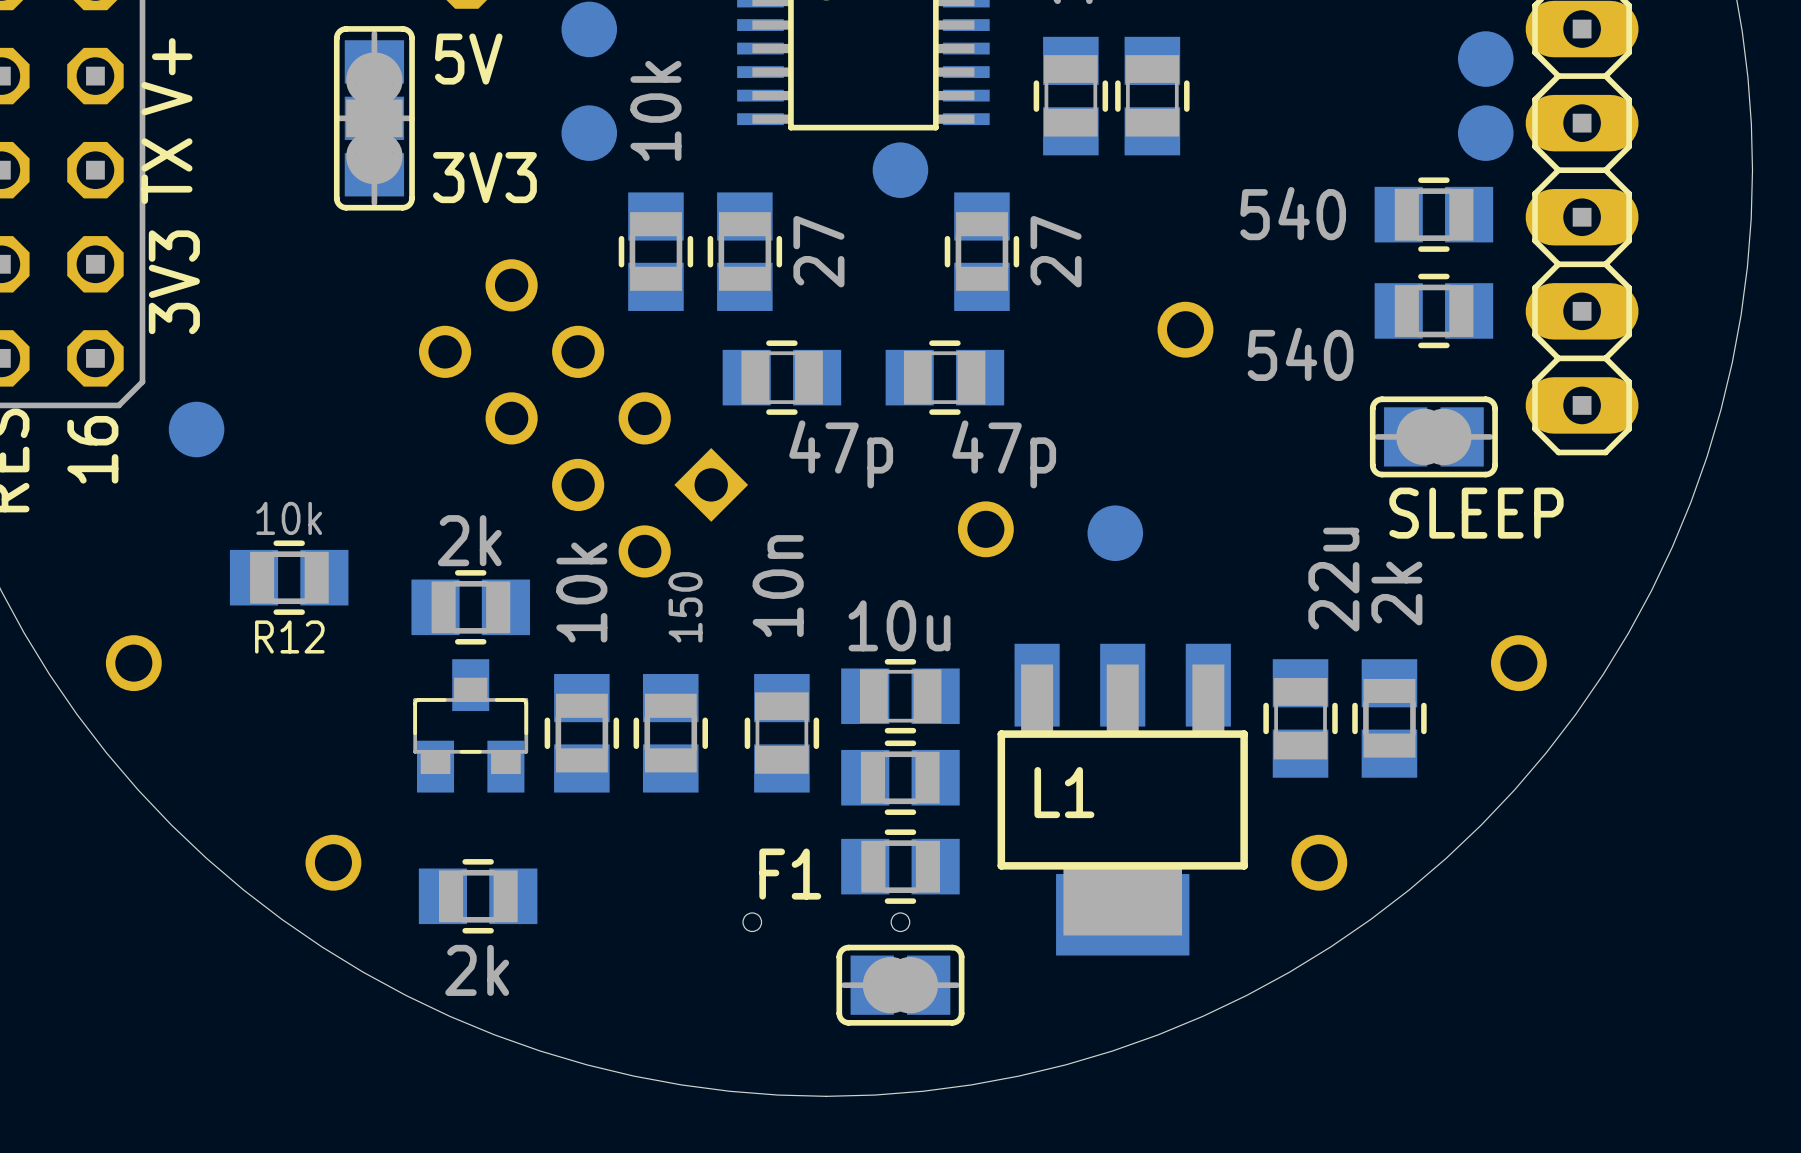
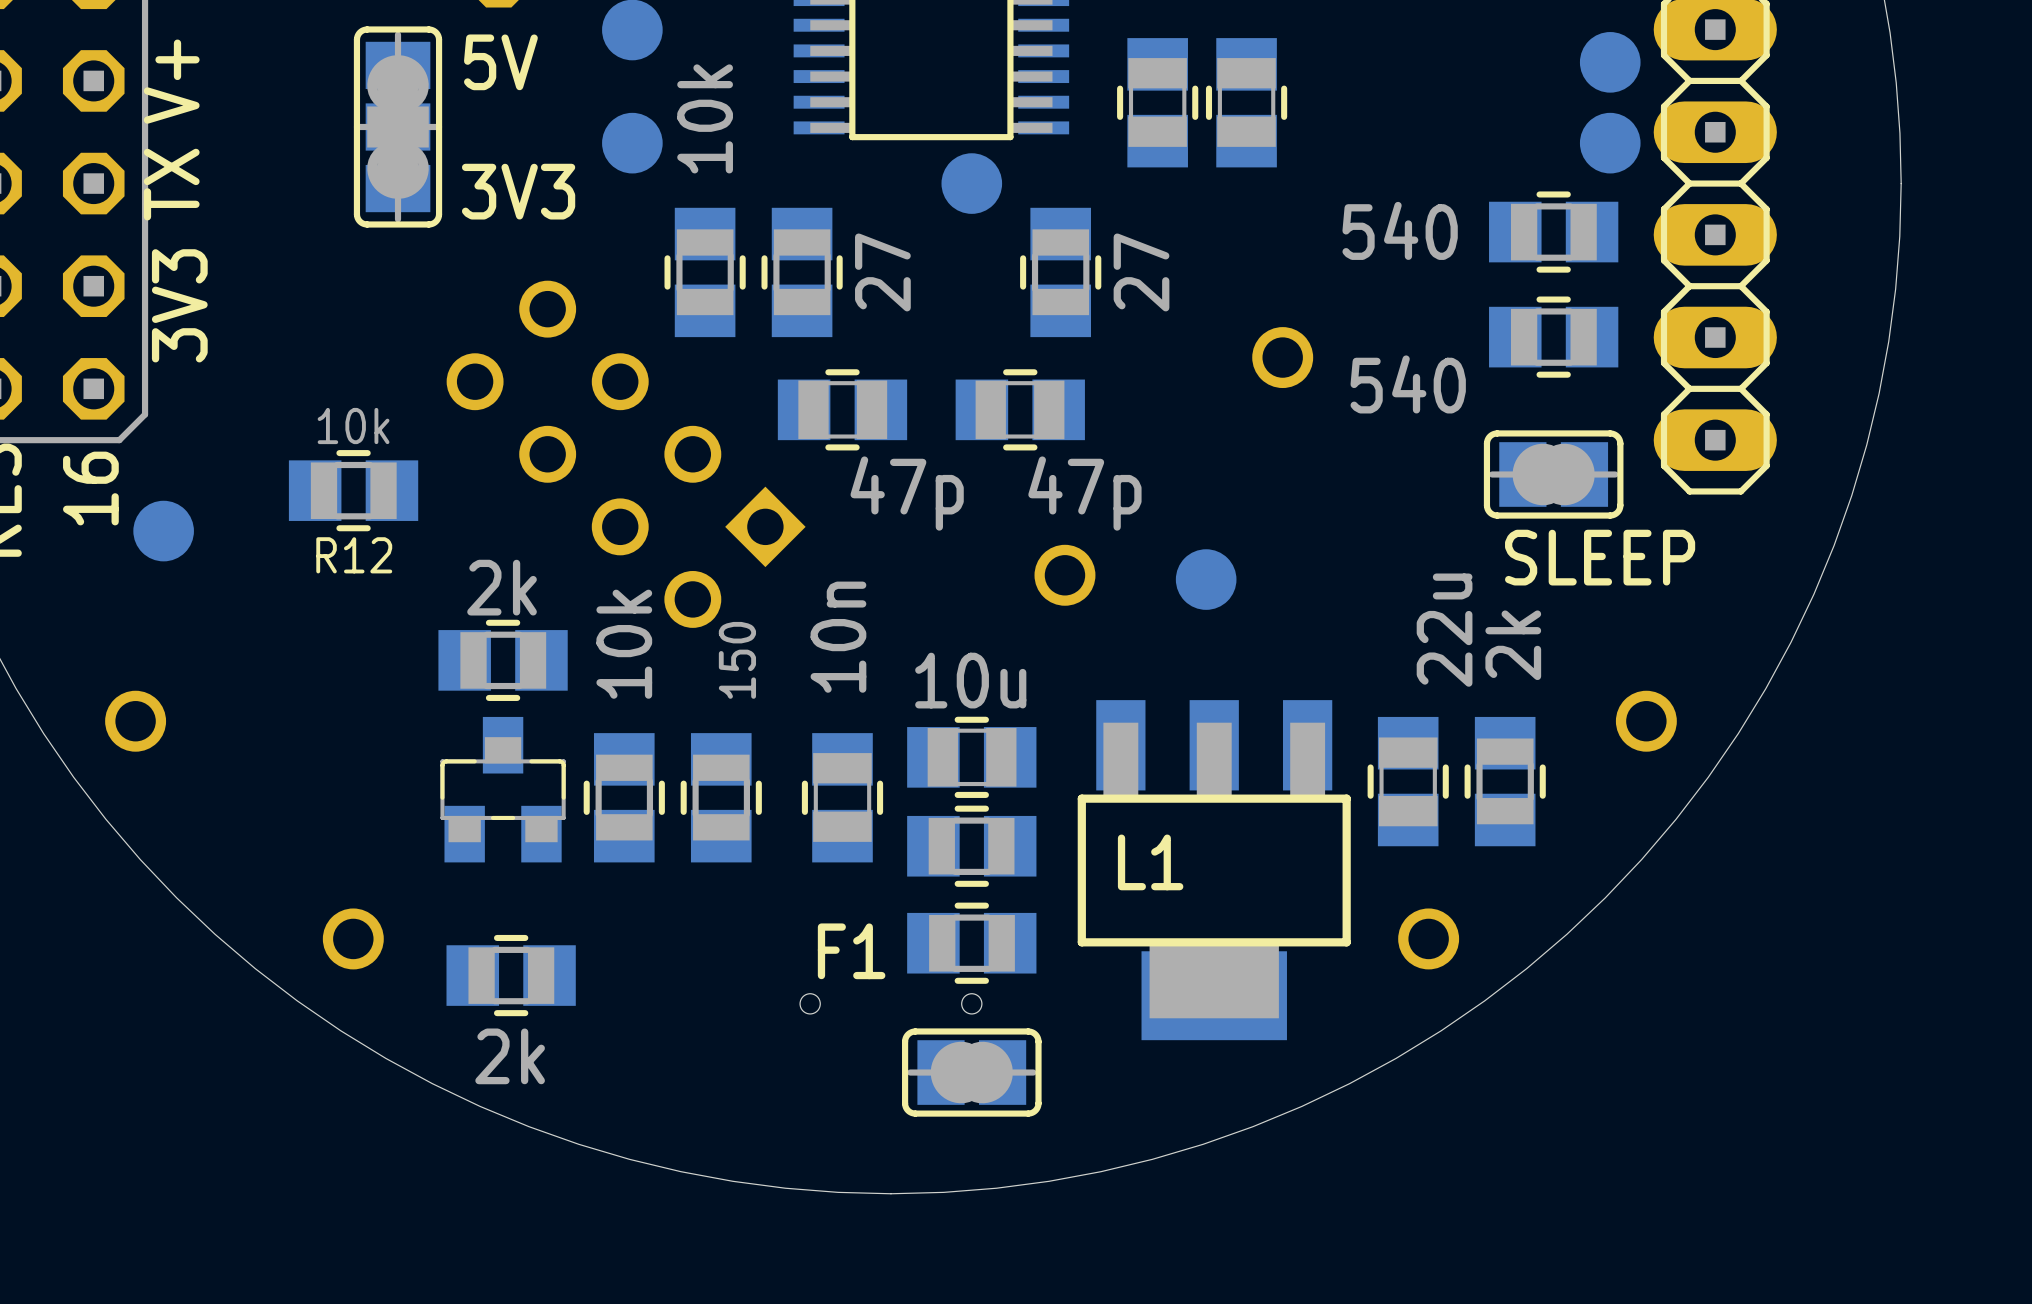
part position: (196, 429) -> (163, 531)
R12 position: (289, 577) -> (353, 490)

